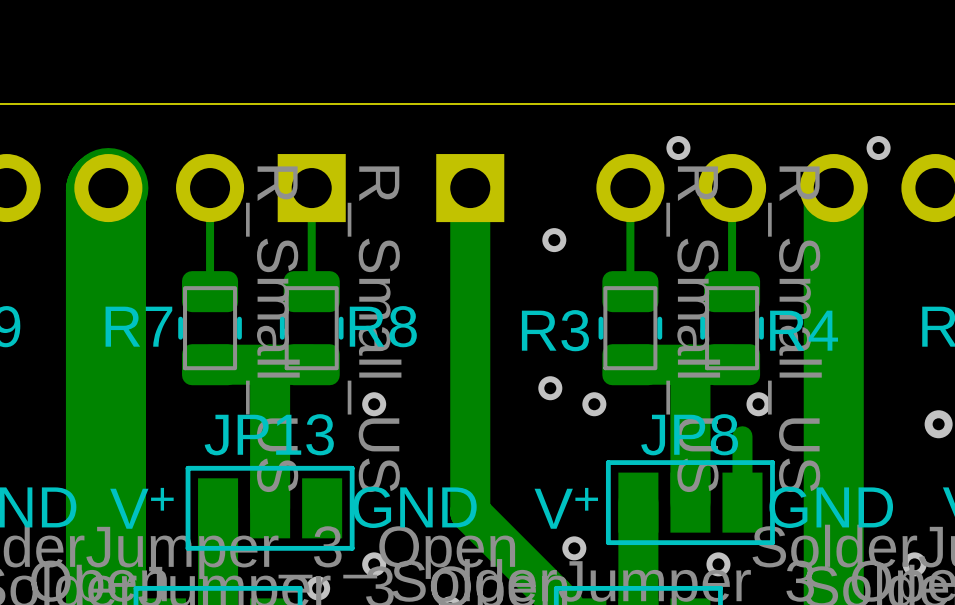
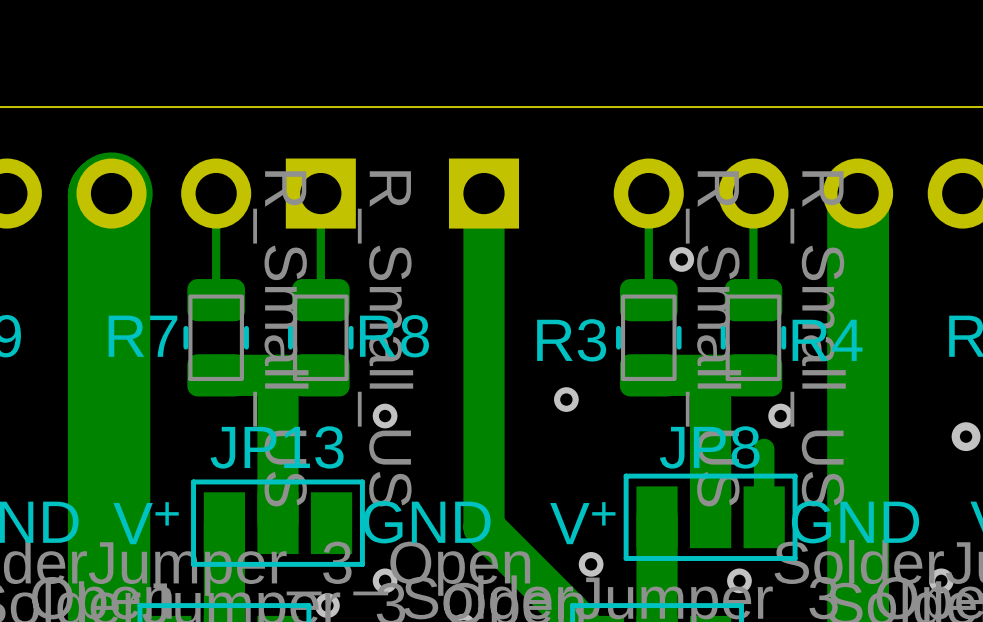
via: (678, 148) -> none
via: (878, 148) -> none
via: (554, 240) -> none
via: none -> (681, 259)
via: (594, 404) -> none

